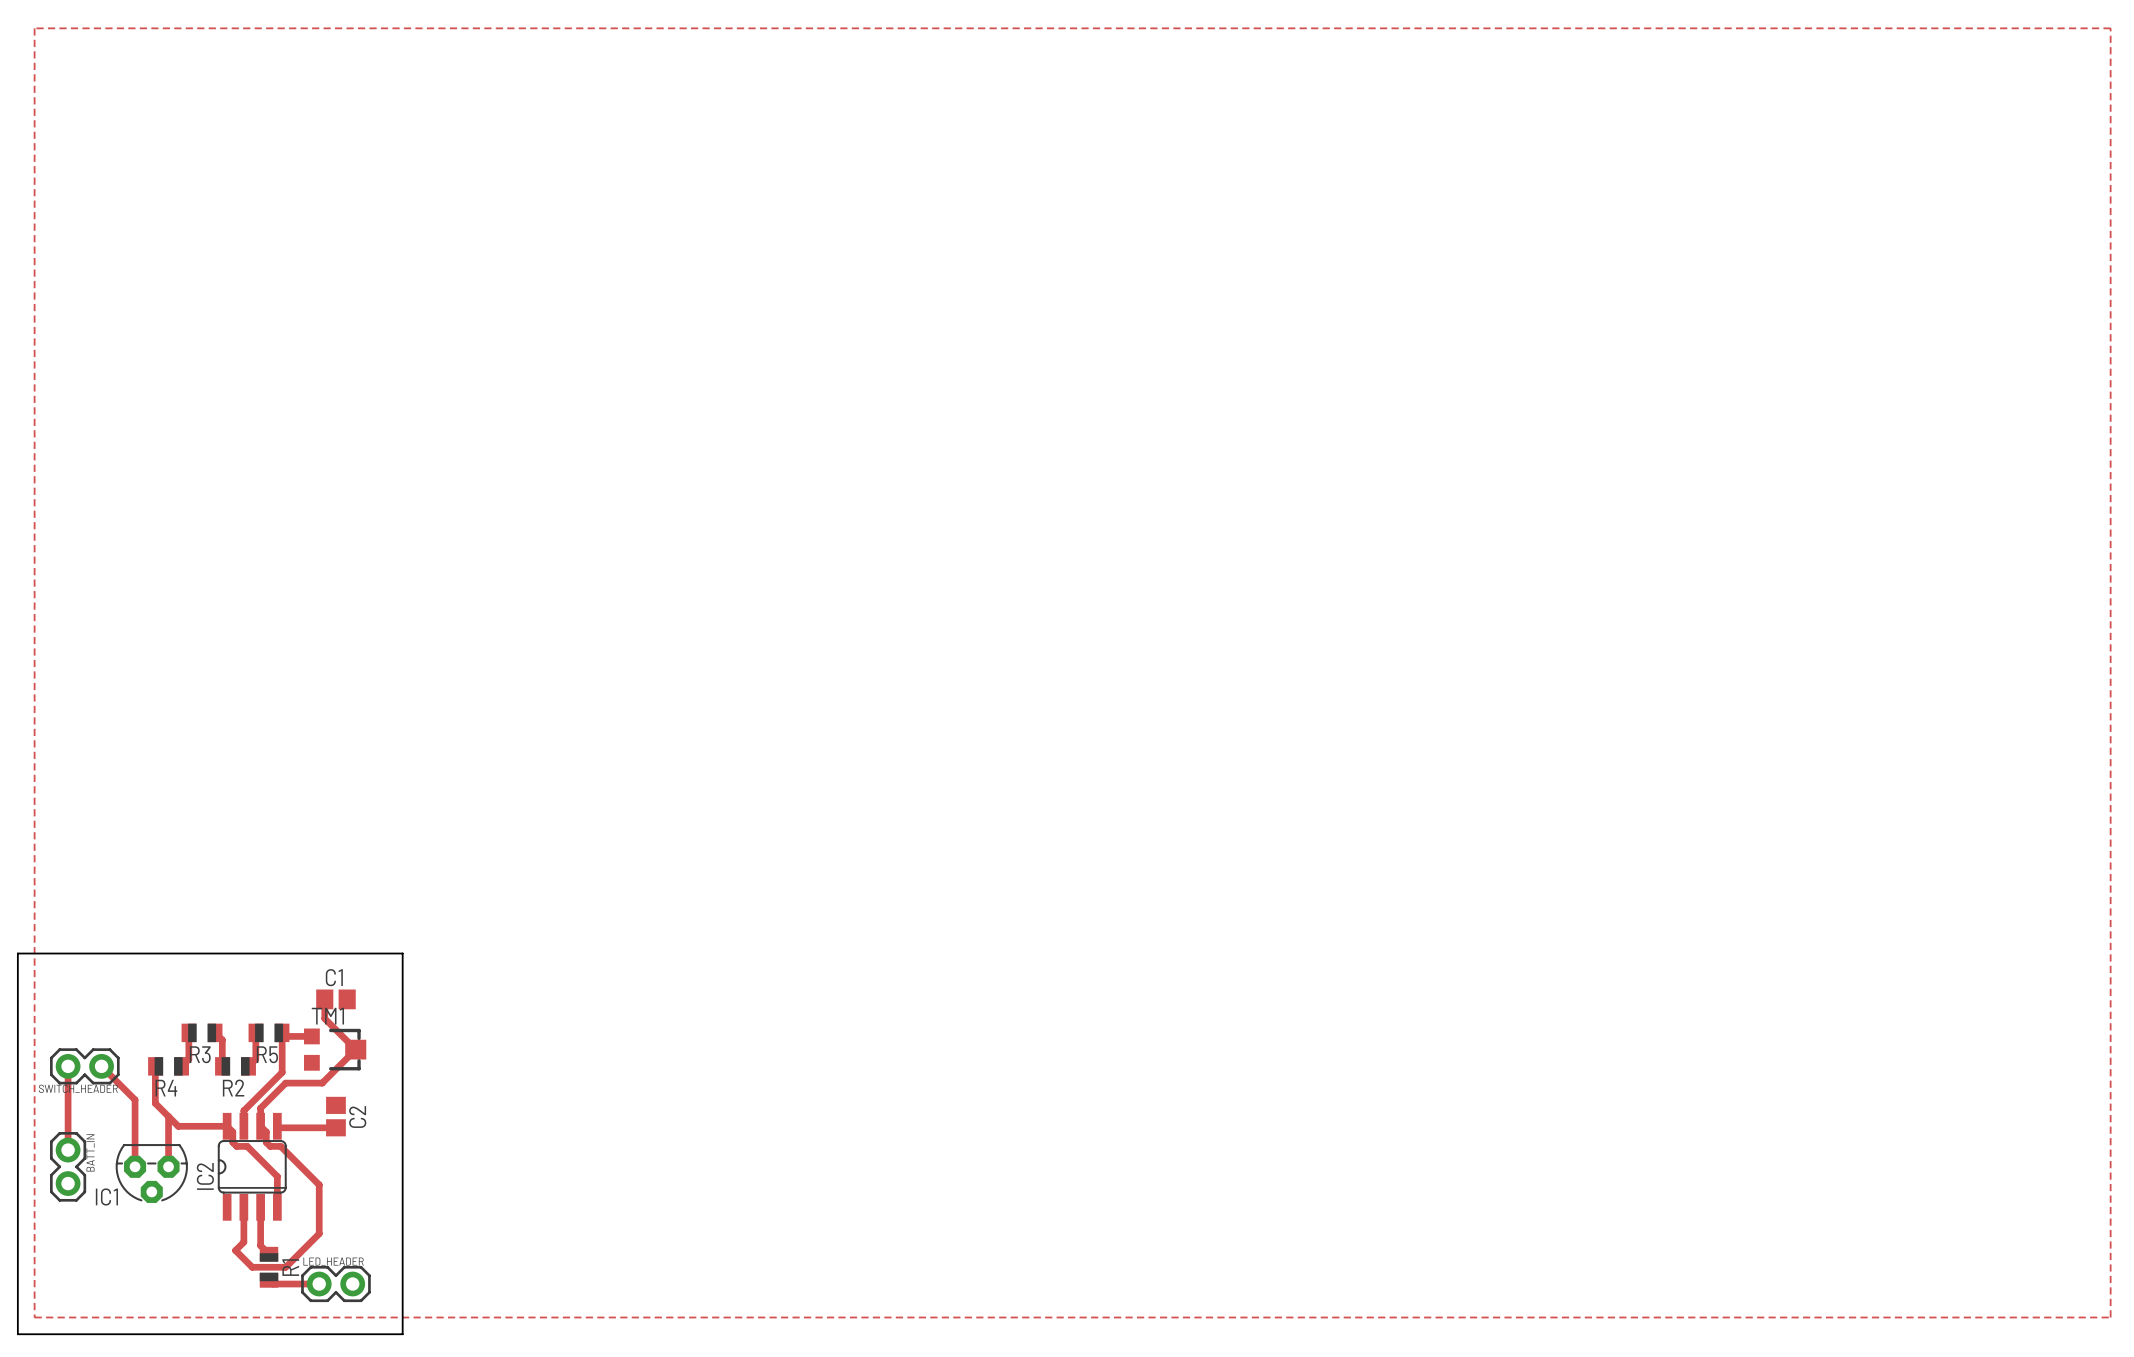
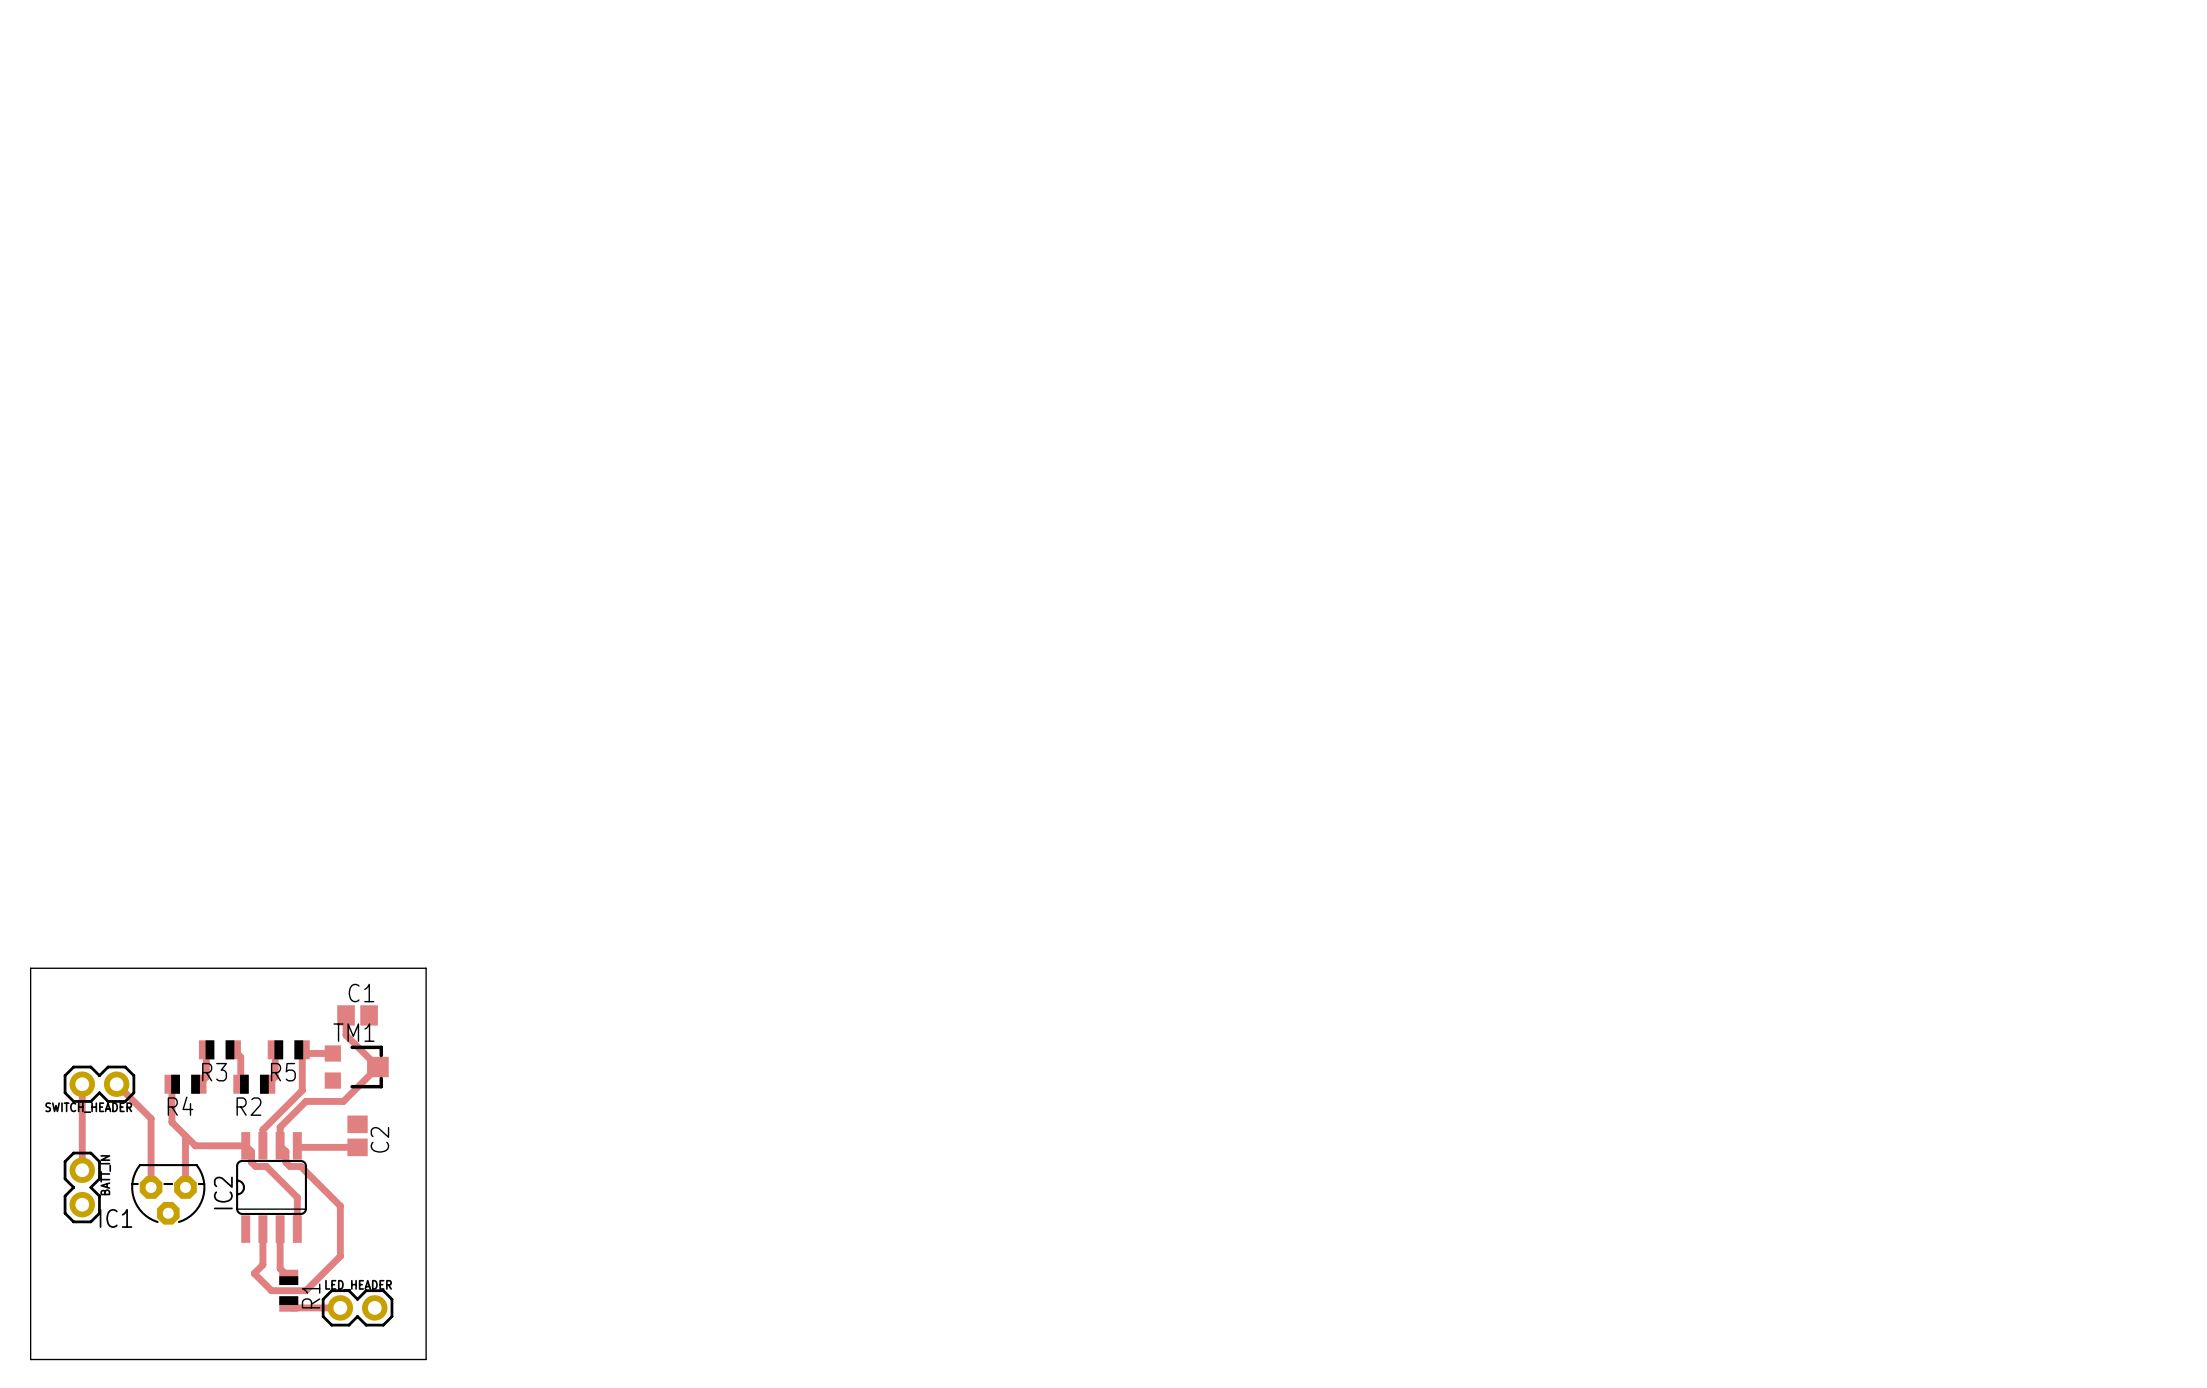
zone outline: (34, 28) (34, 1317) (2110, 1317) (2110, 28) (34, 28) -> none

